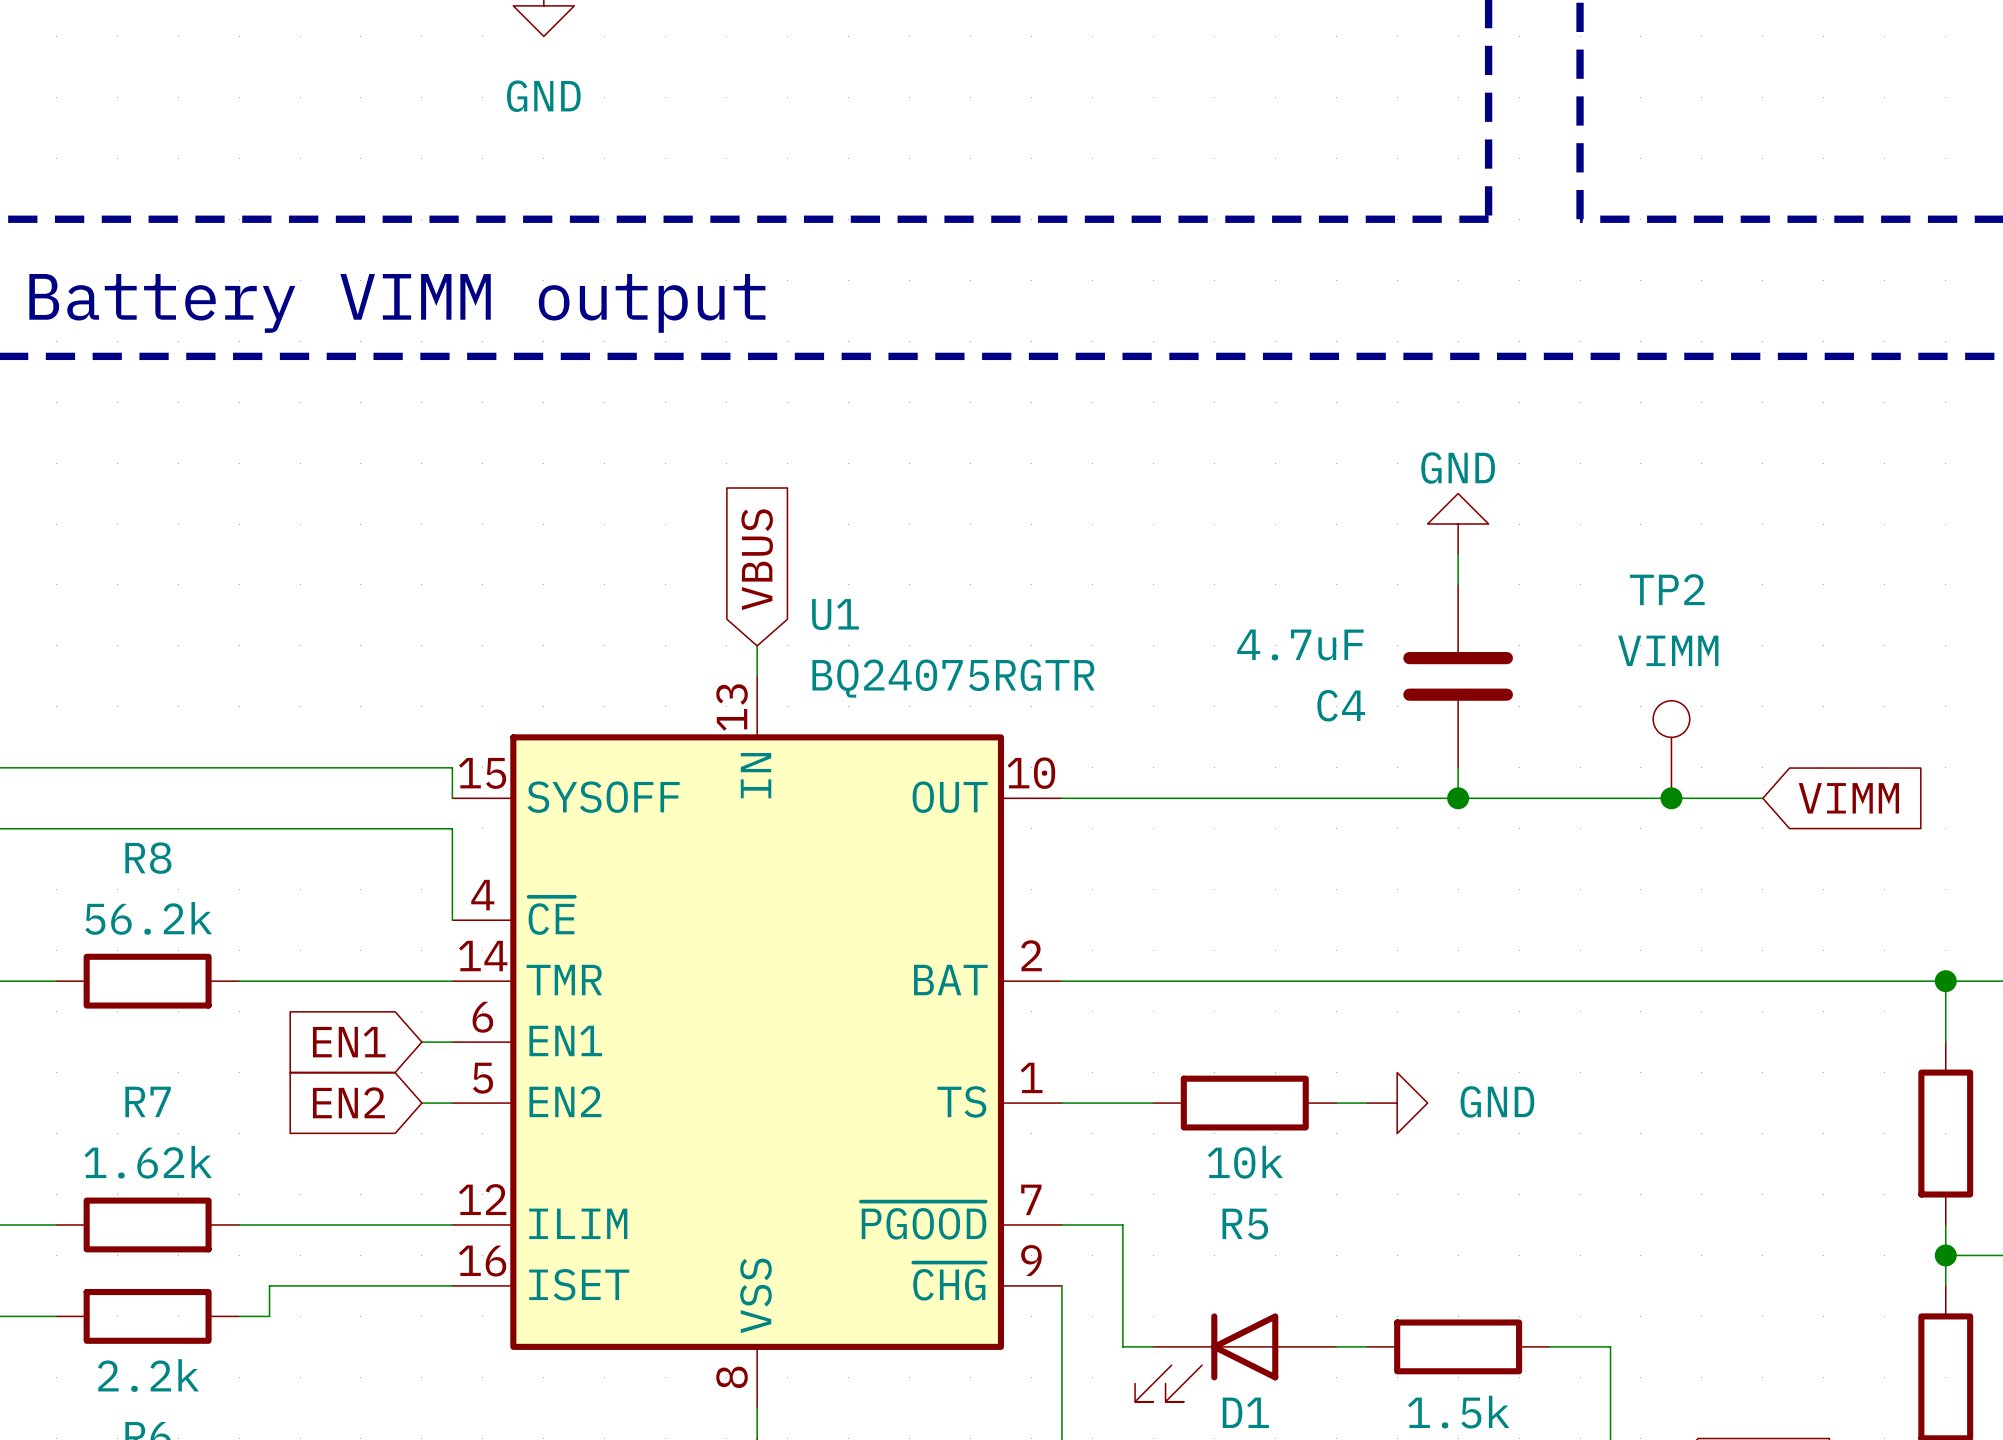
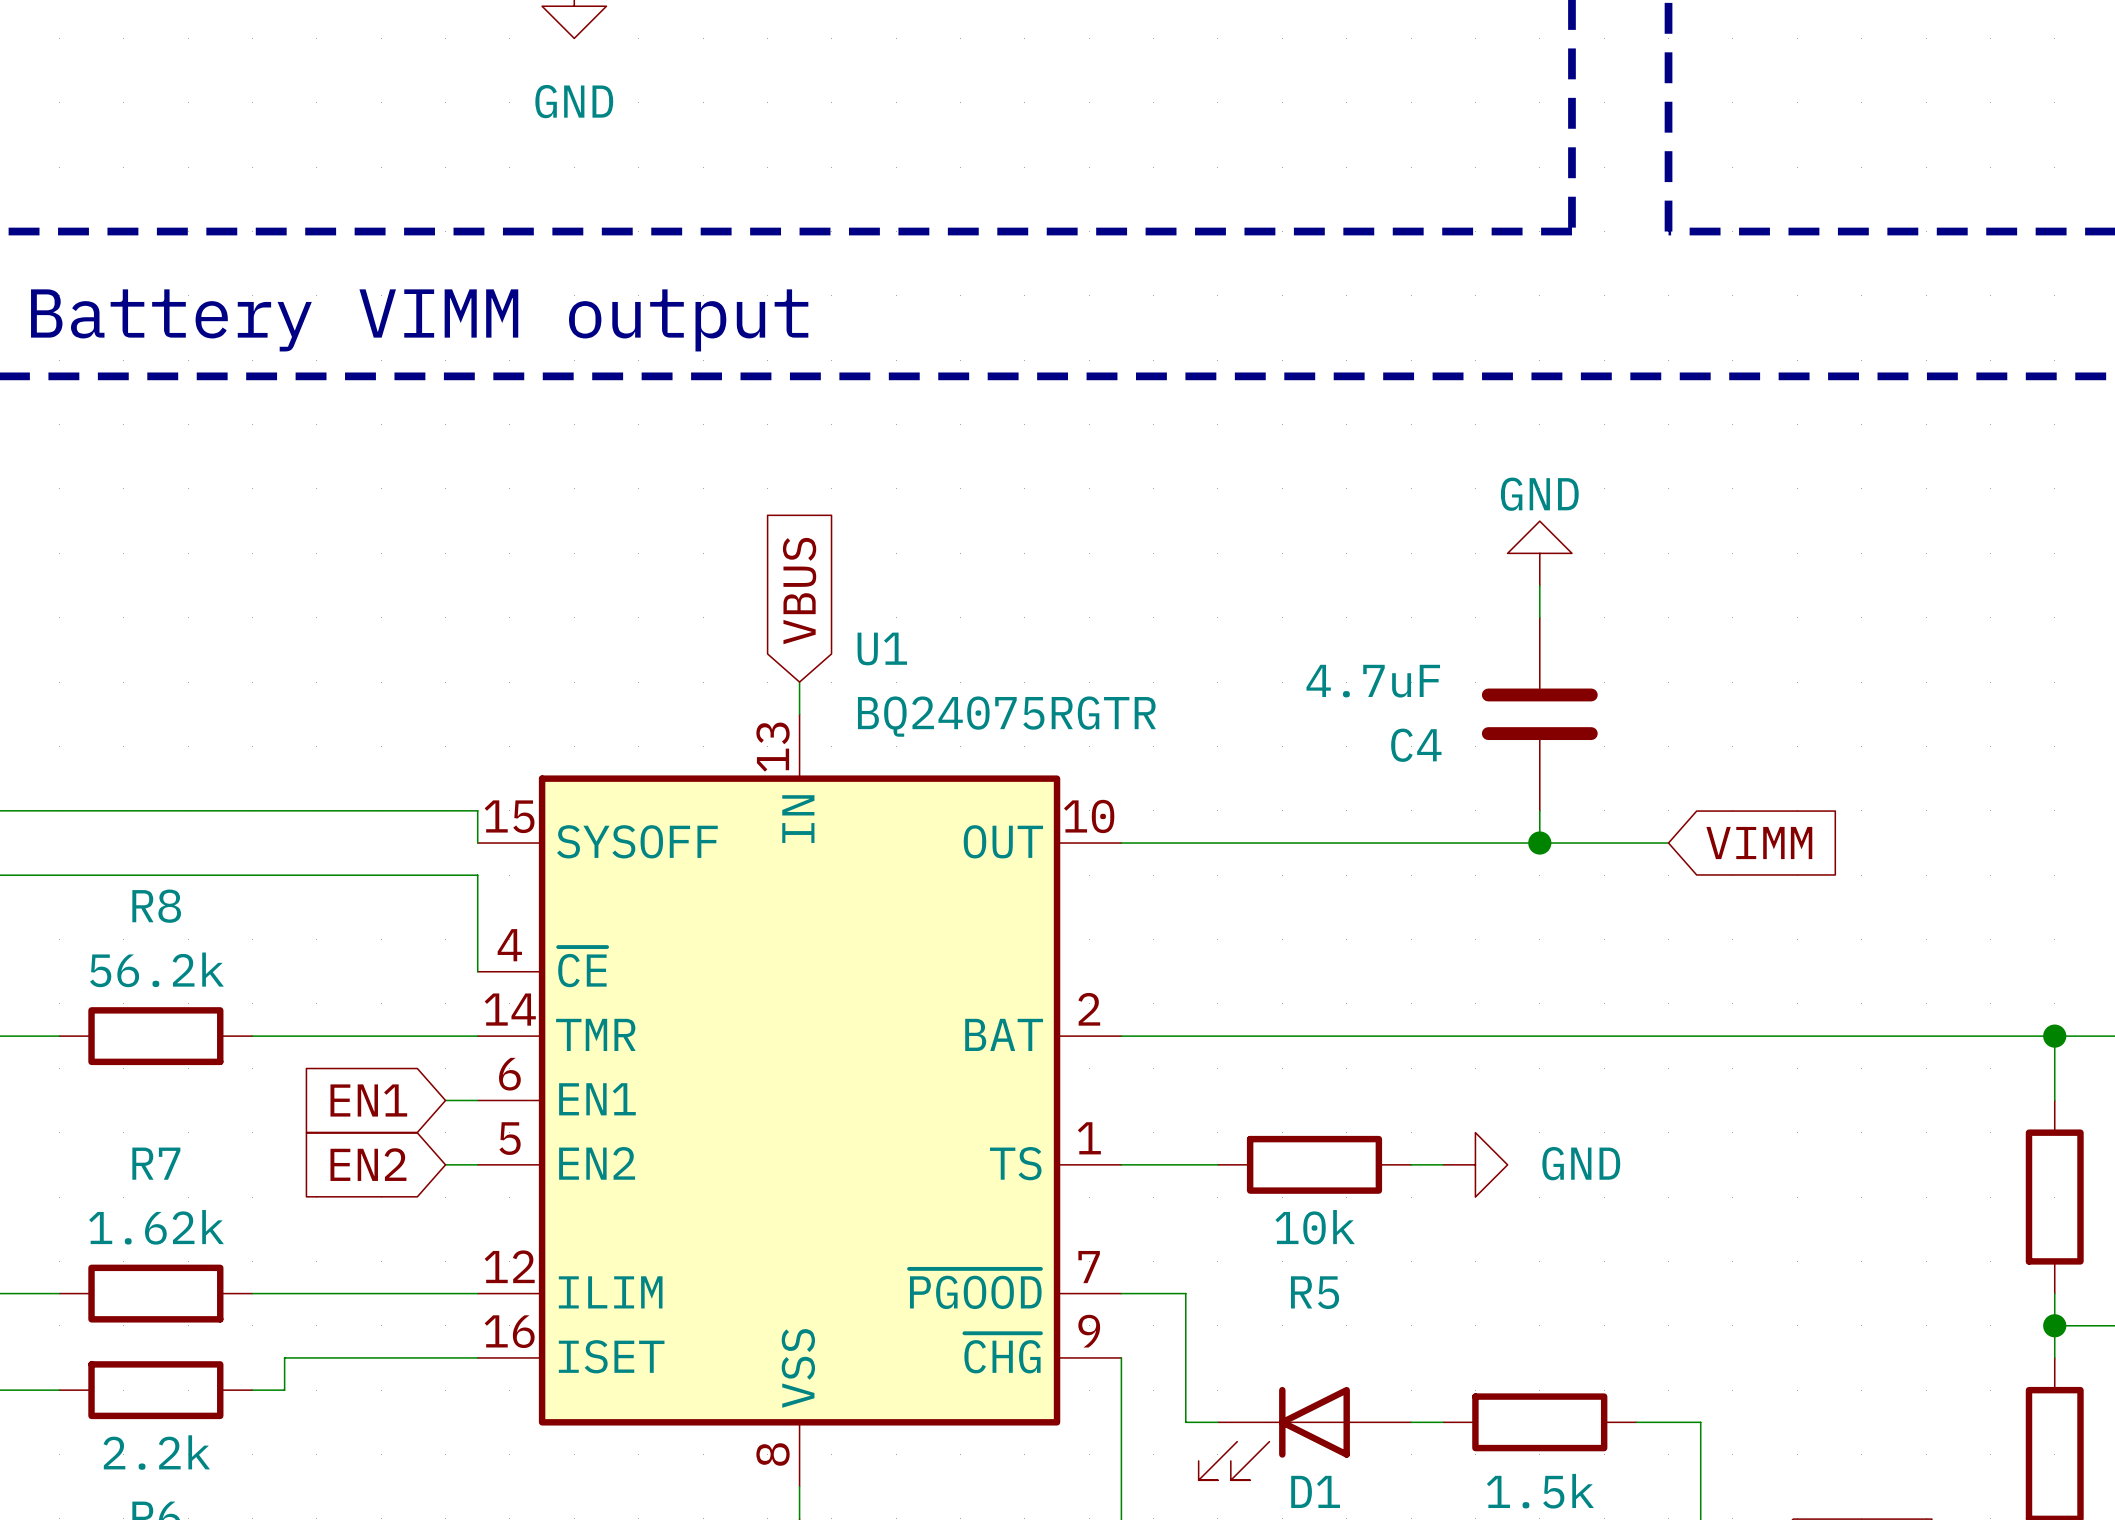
TP2: VIMM (1671, 749) -> none
wire: (1580, 798) (1762, 798) -> none
junction: (1671, 798) -> none
global label position: VIMM (1848, 798) -> VIMM (1759, 843)

